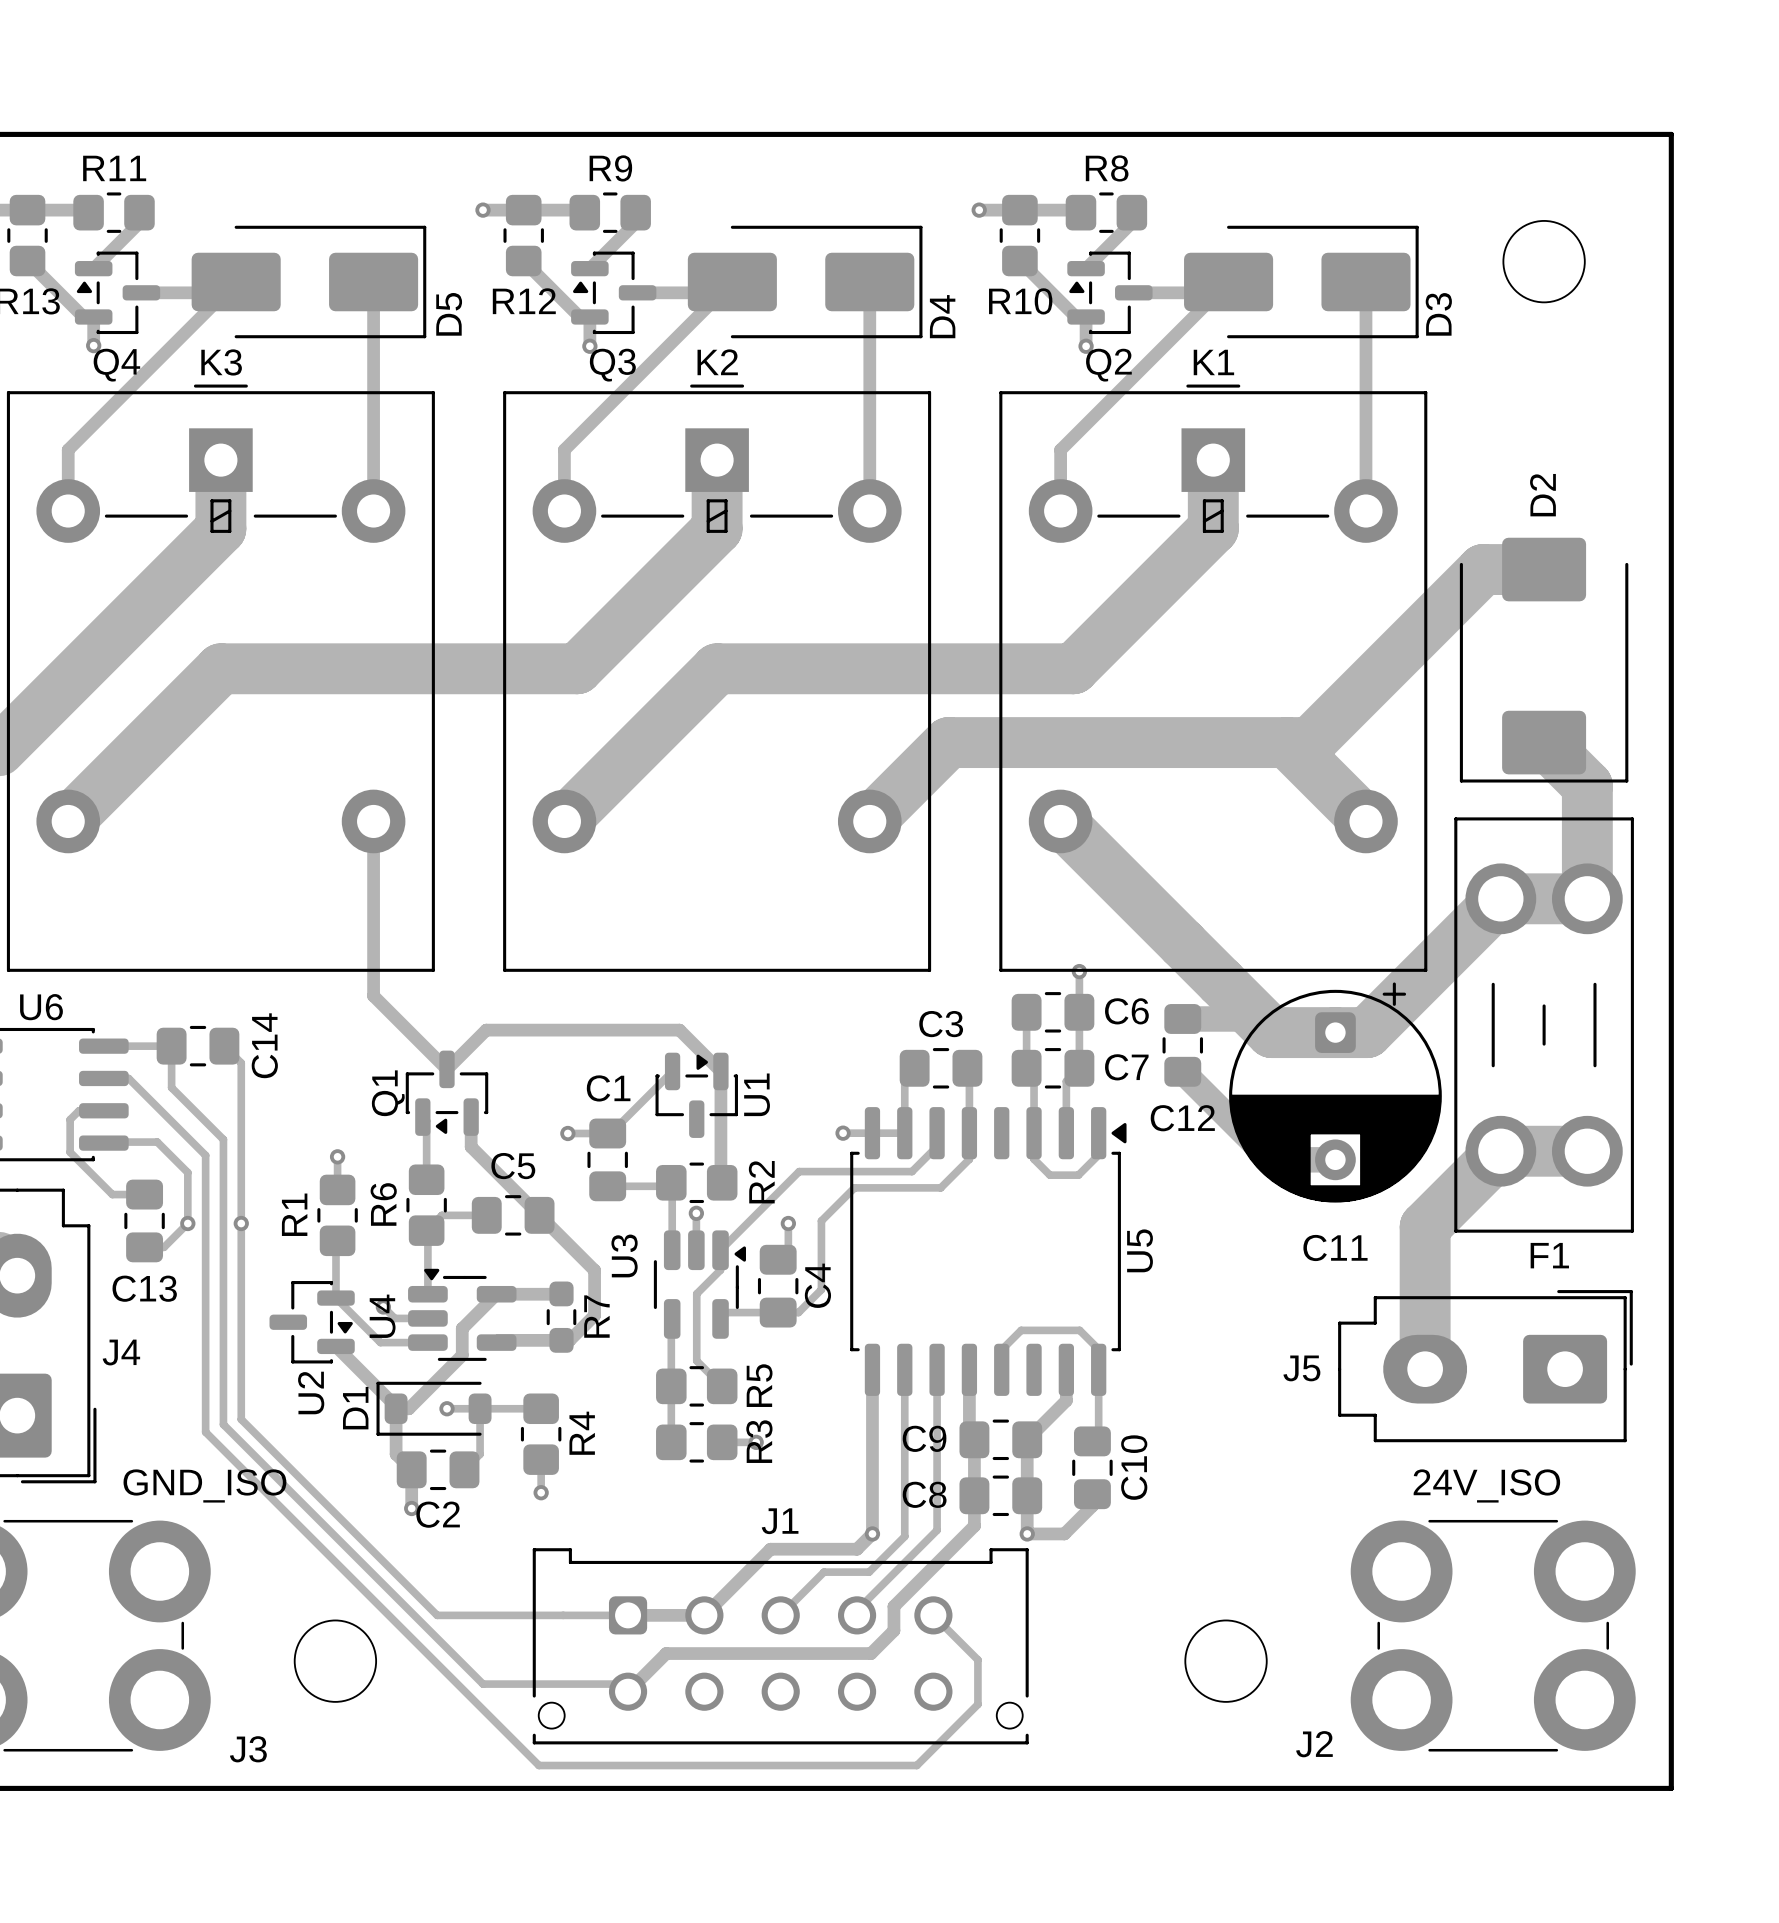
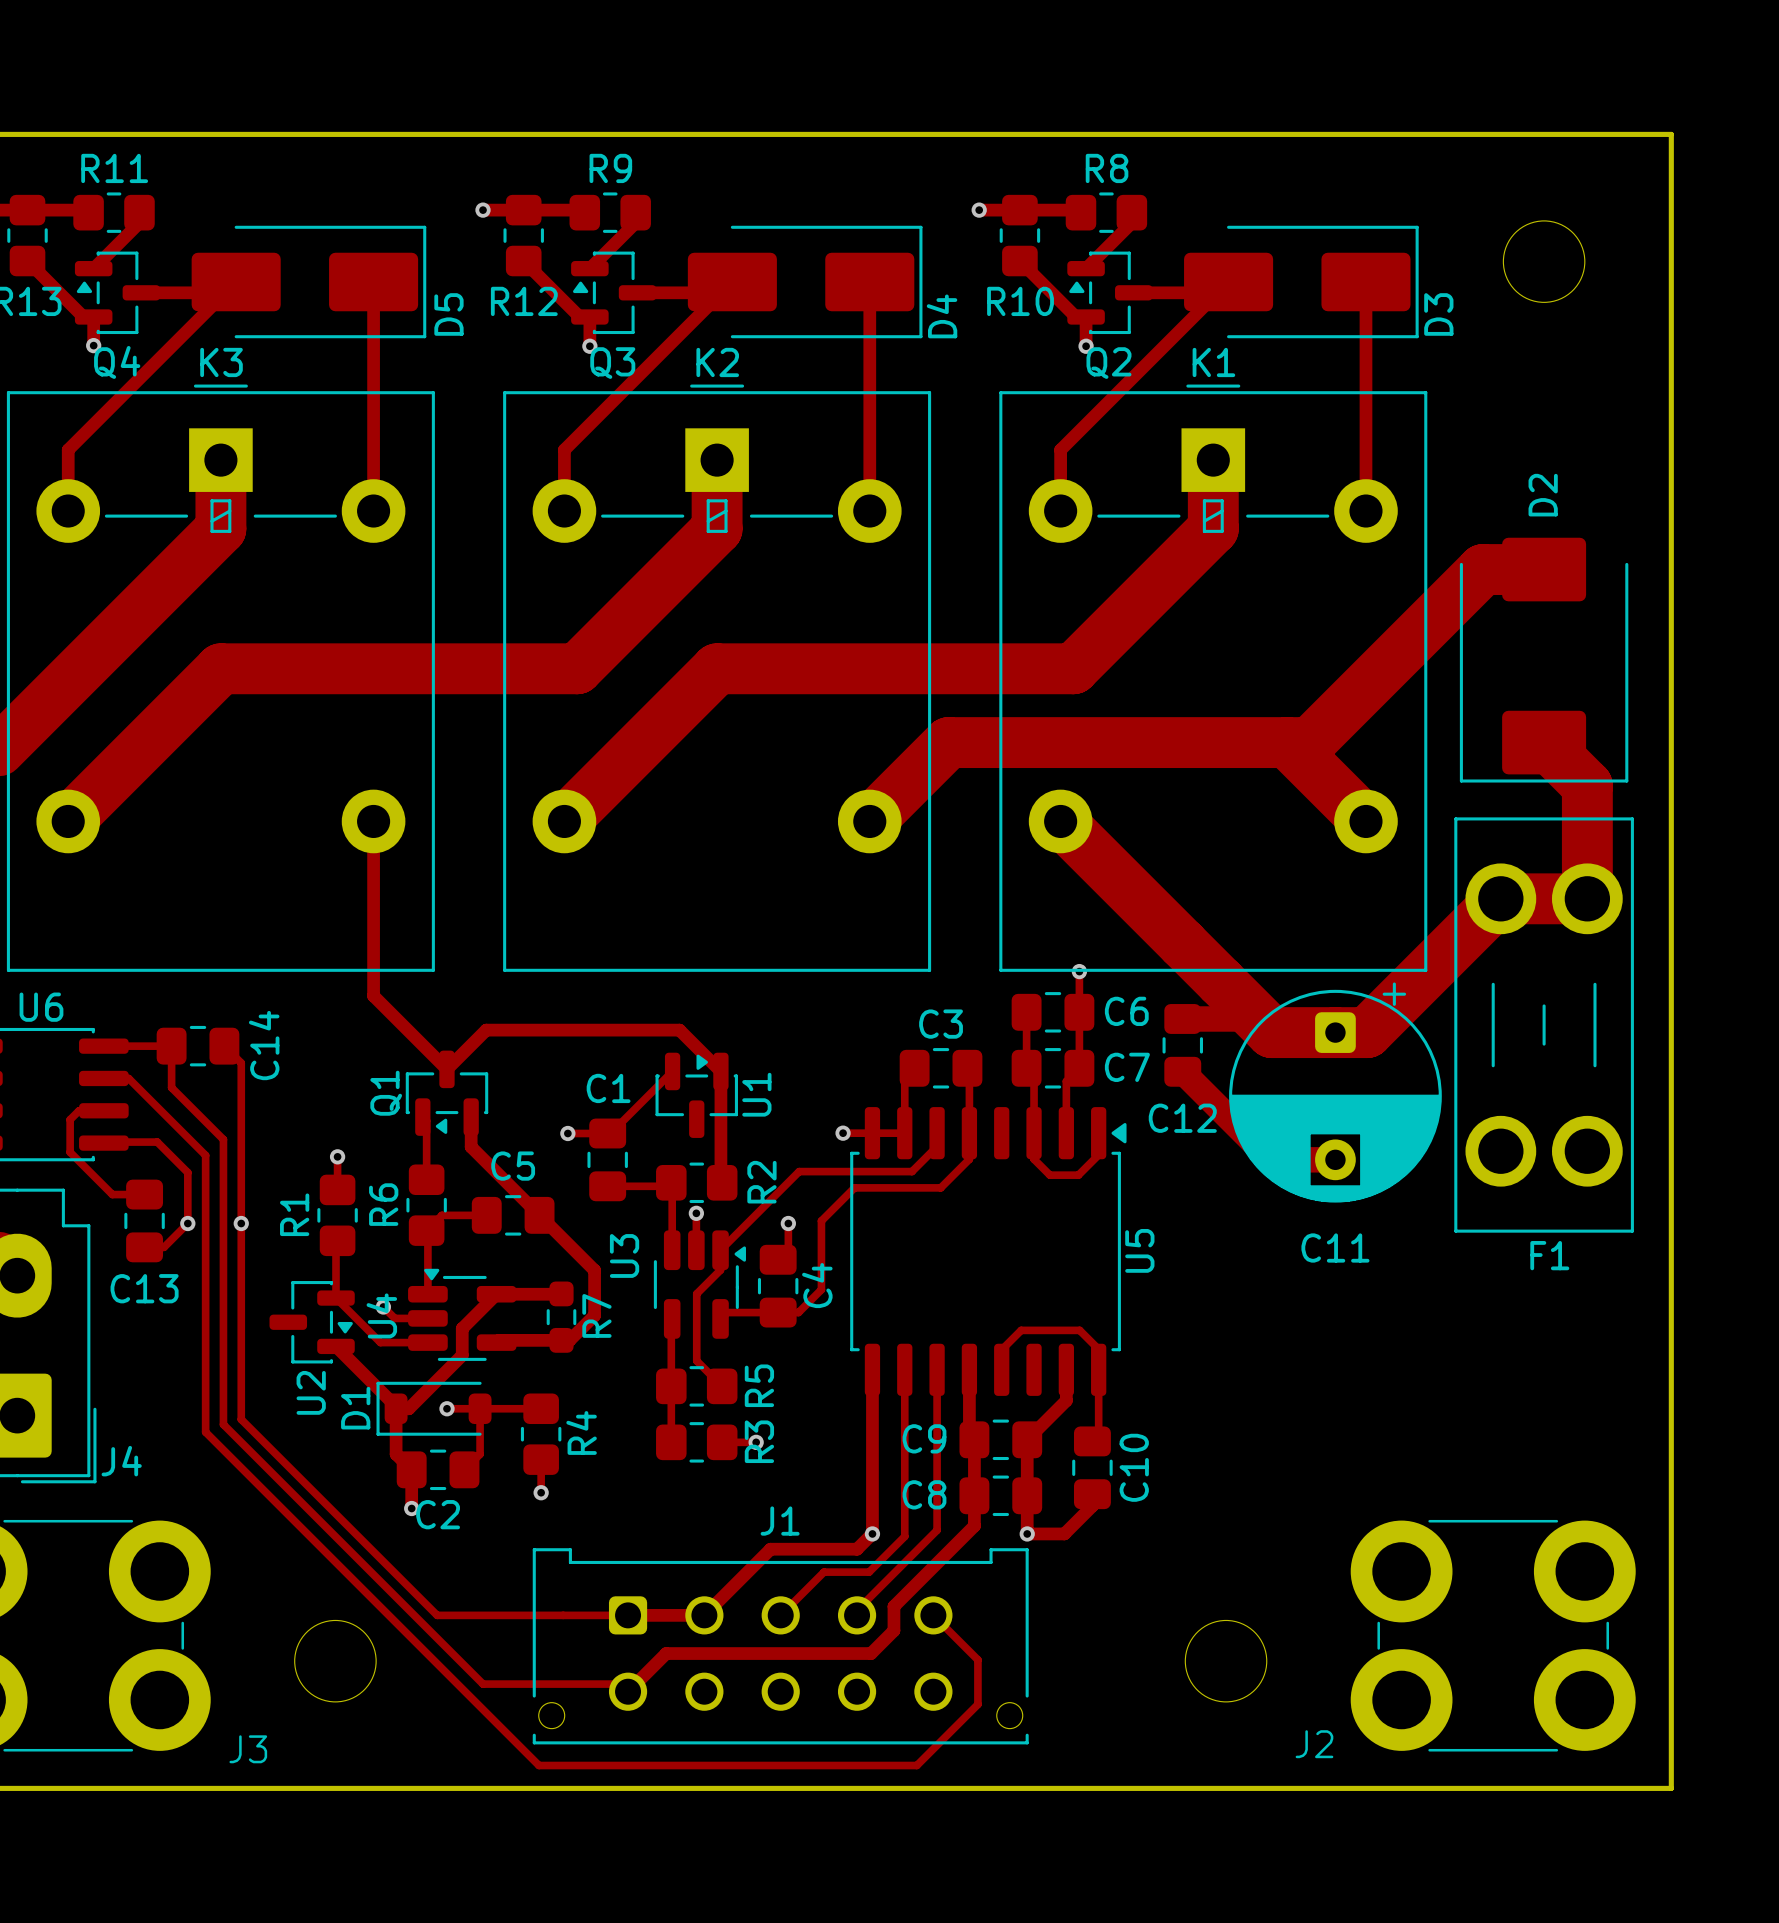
track: (1587, 1151) (1500, 1151) (1425, 1226) (1425, 1369) -> none
J4 name position: J4 (121, 1352) -> J4 (121, 1461)
J5: (1485, 1366) -> none
text: GND_ISO (204, 1485) -> none
text: 24V_ISO (1486, 1485) -> none

